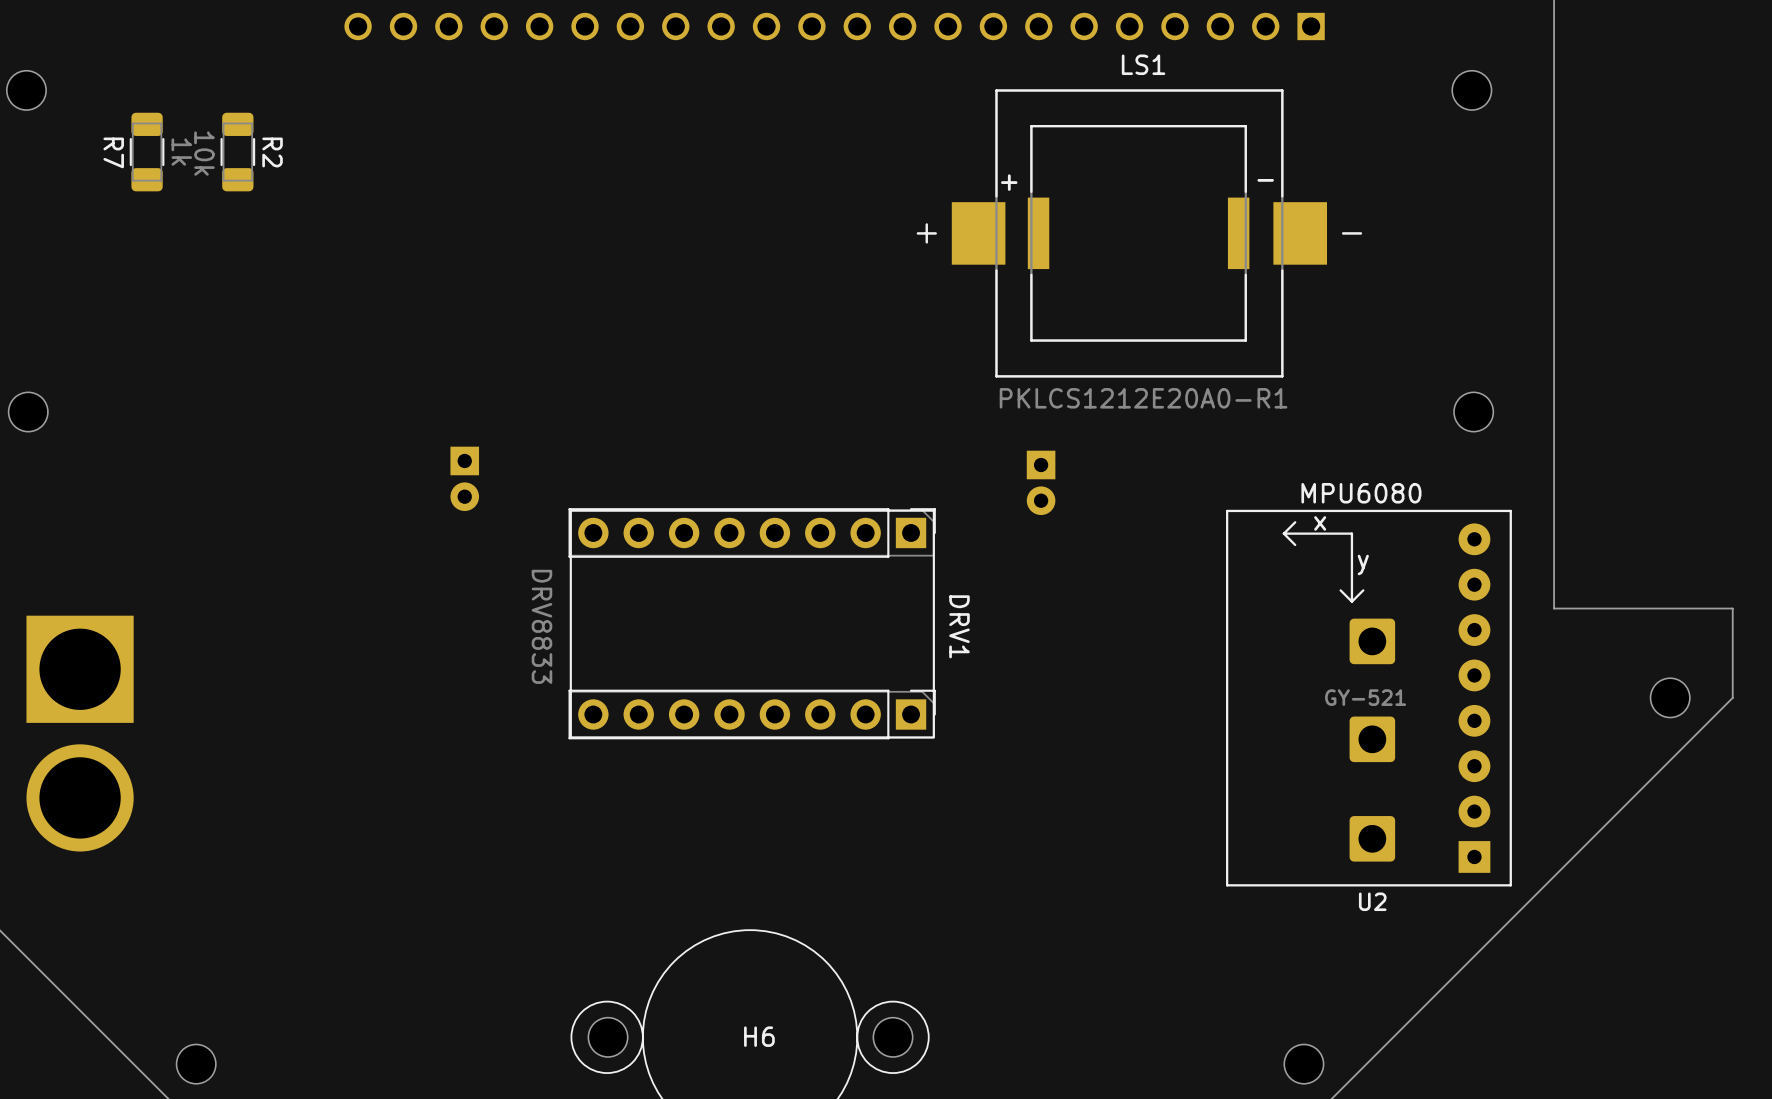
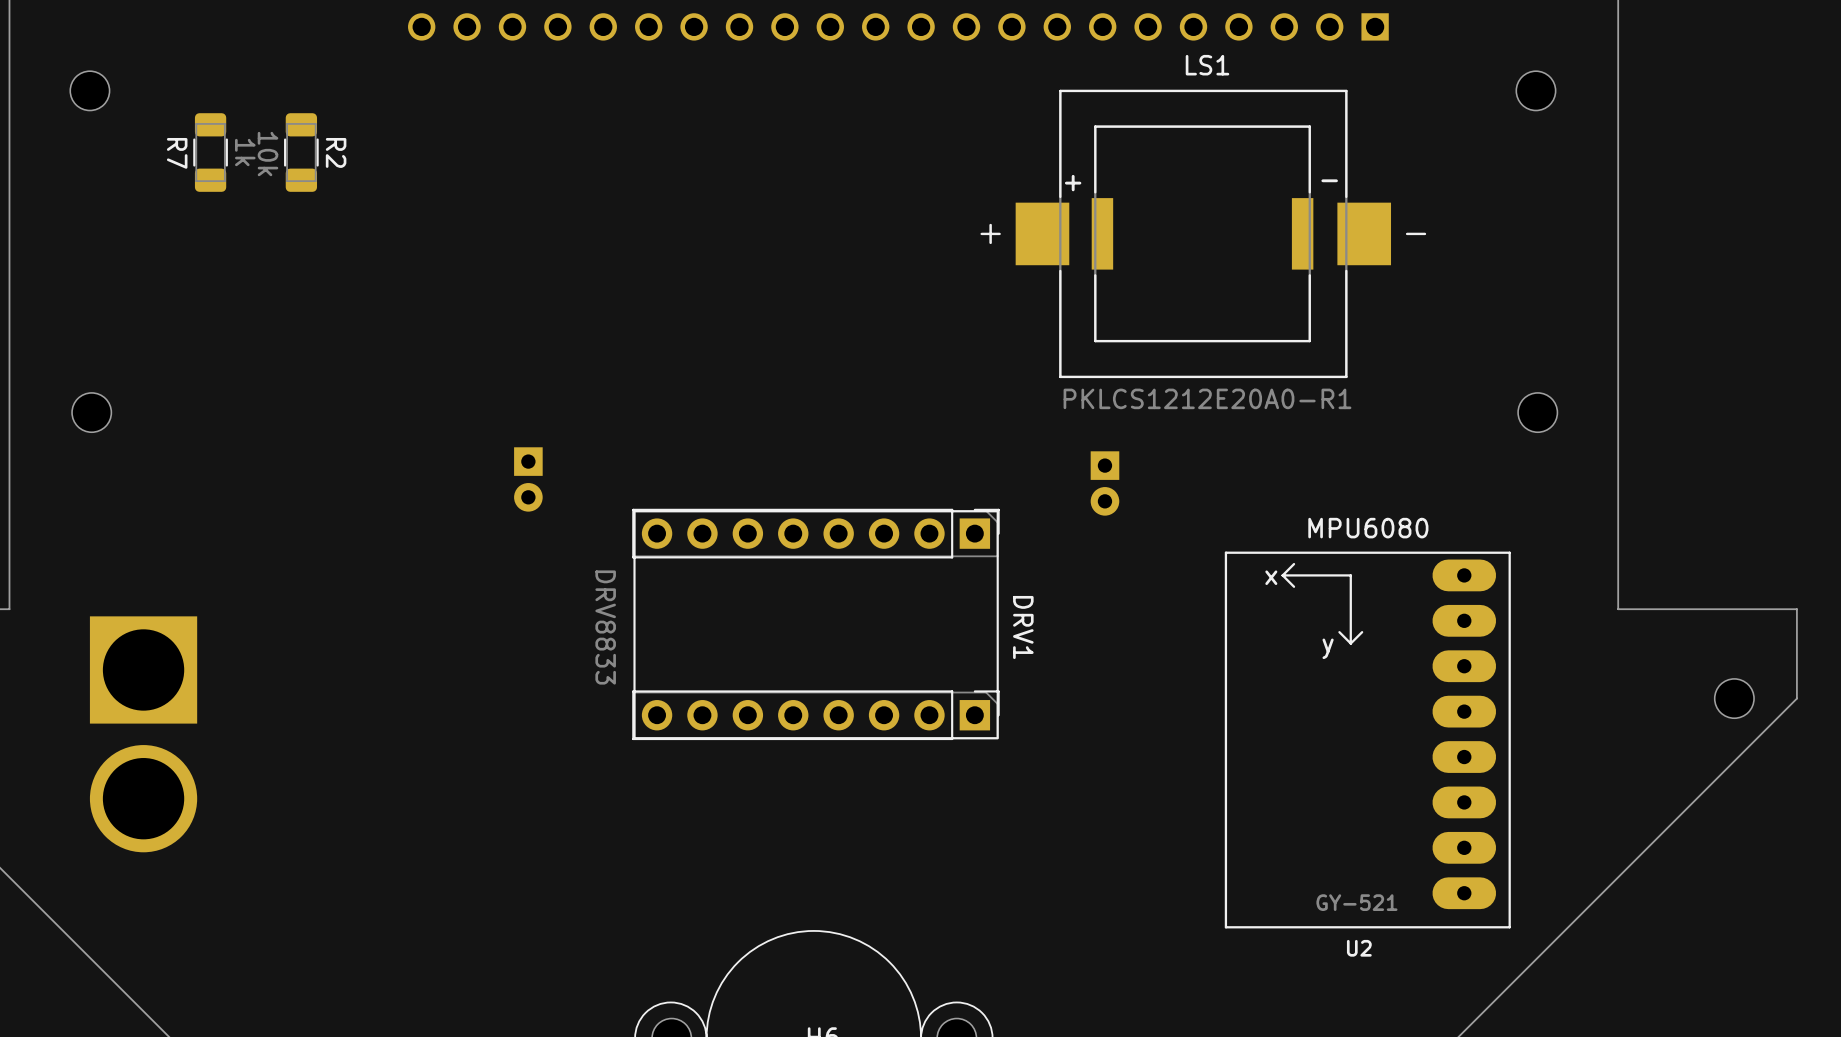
U2 footprint: [1226, 509, 1512, 887] -> [1224, 551, 1511, 929]
part: (1372, 641) -> none
U2 value position: GY-521 (1365, 697) -> GY-521 (1356, 902)
part: (1372, 739) -> none
part: (1372, 838) -> none

